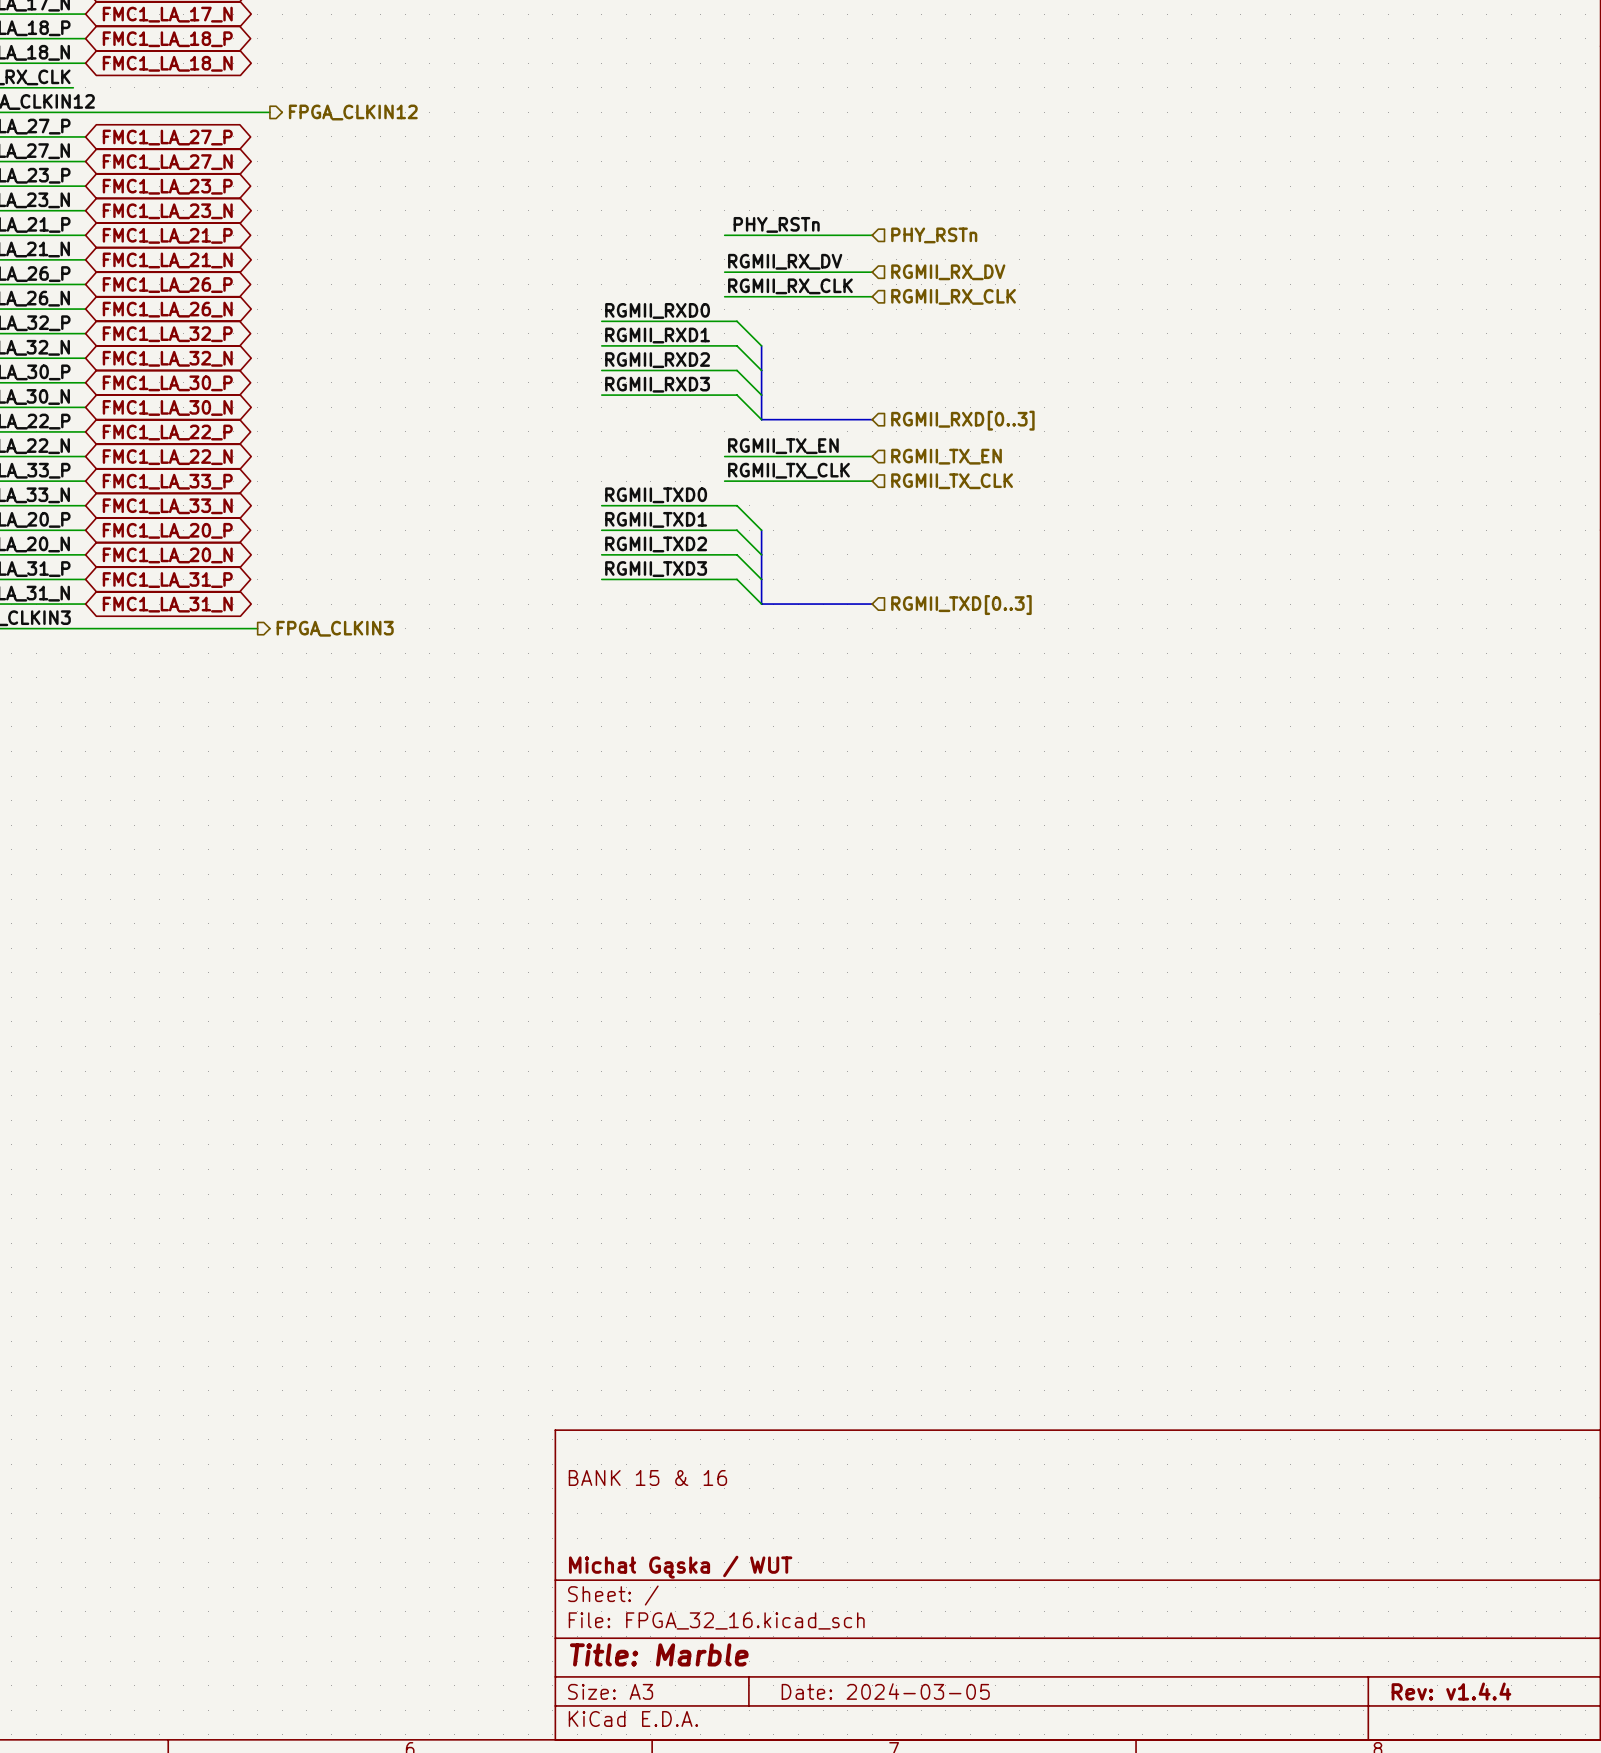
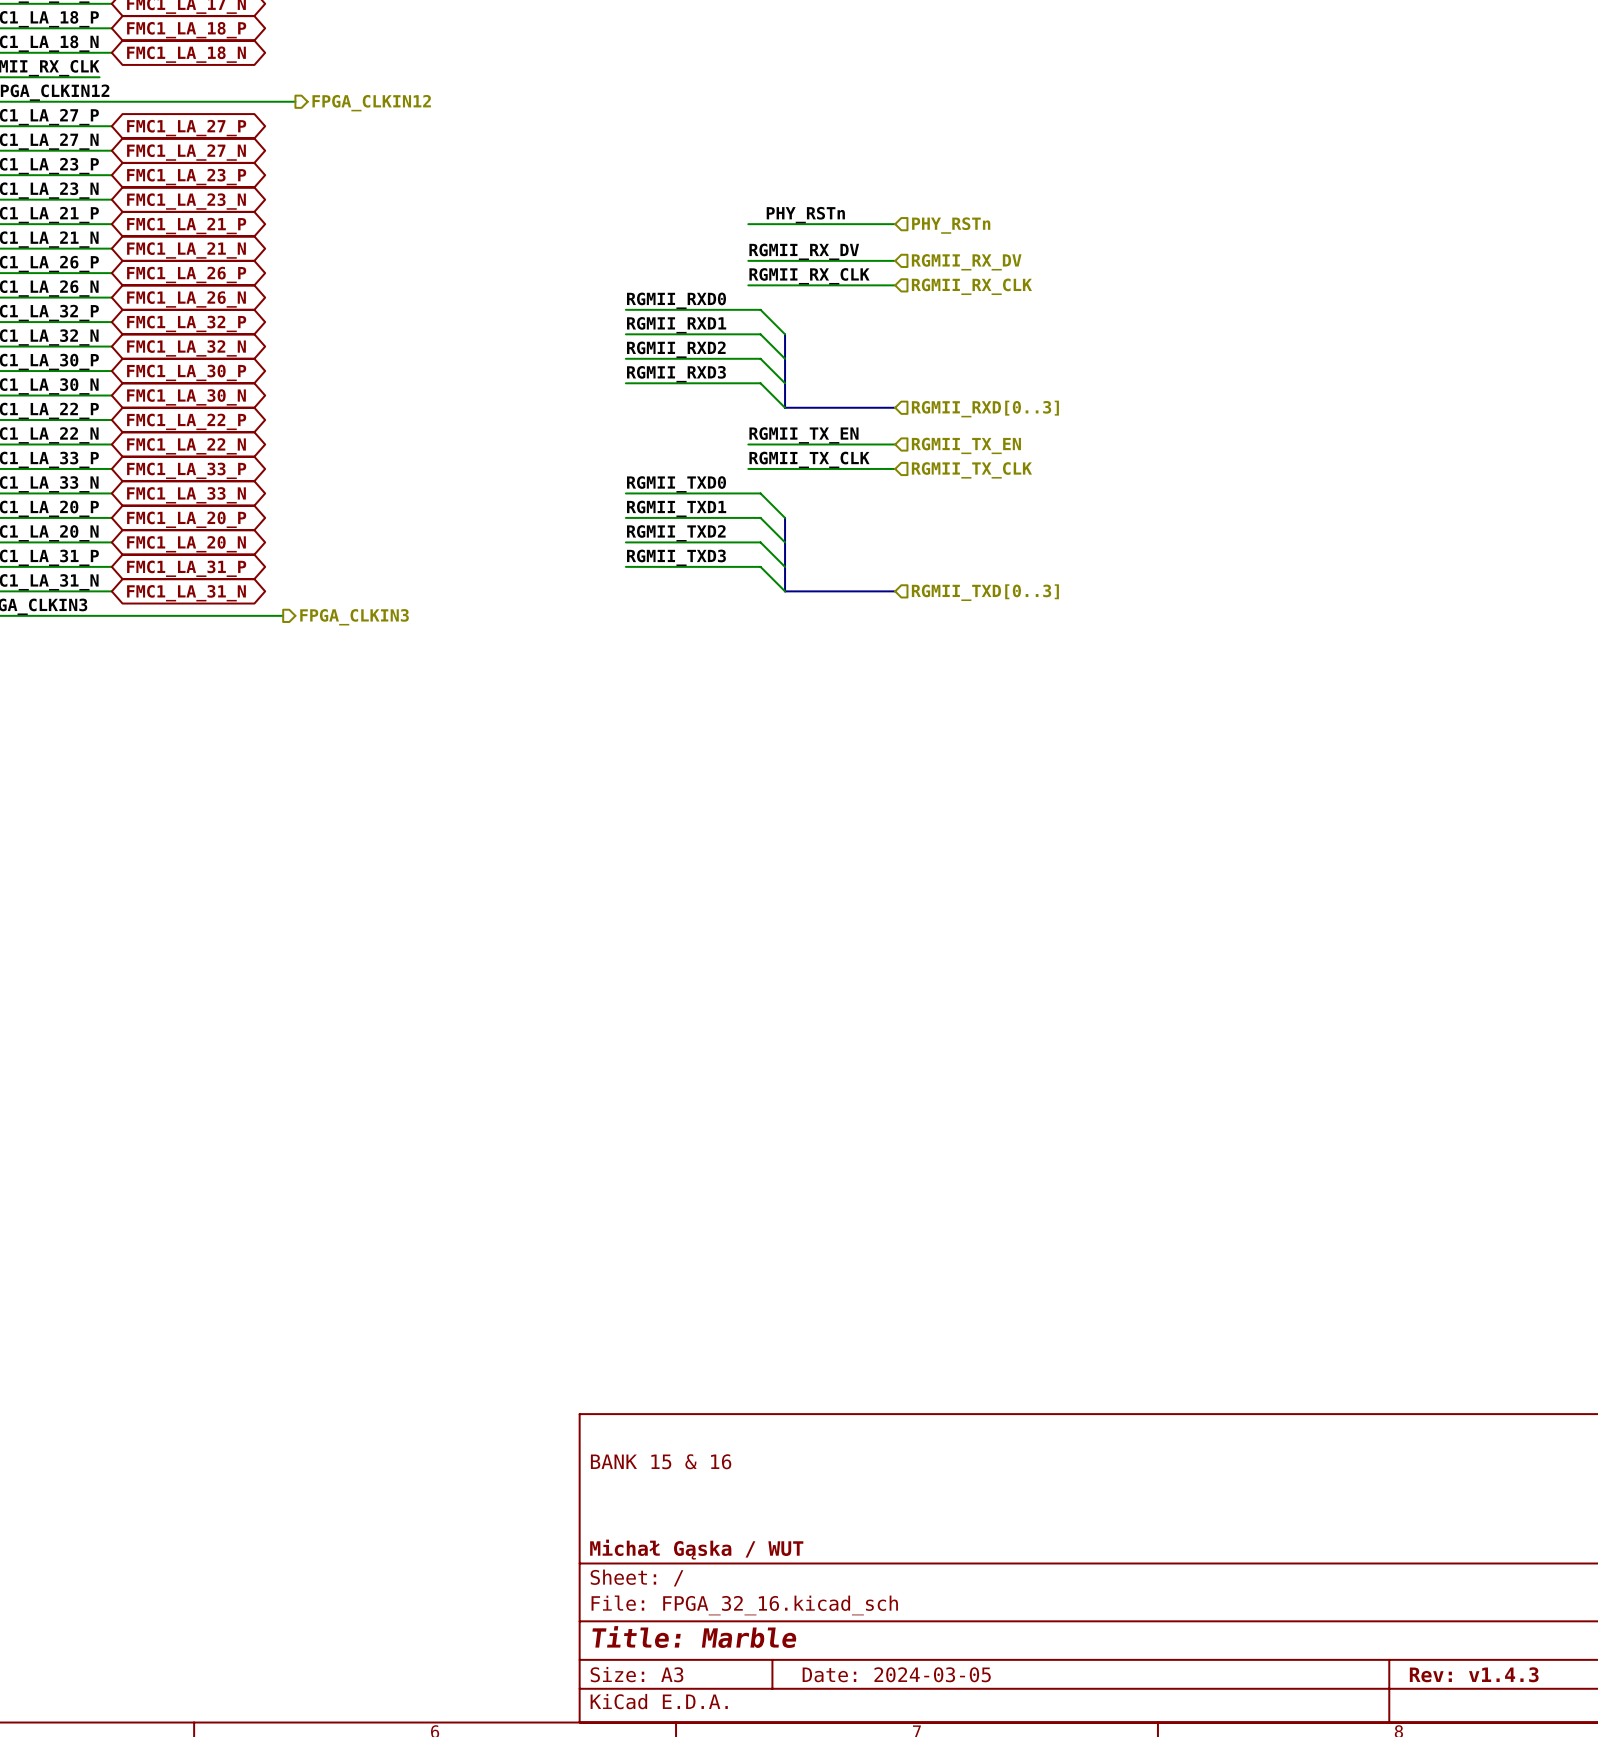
title block: Rev: v1.4.4 (1451, 1691) -> Rev: v1.4.3 (1474, 1674)

